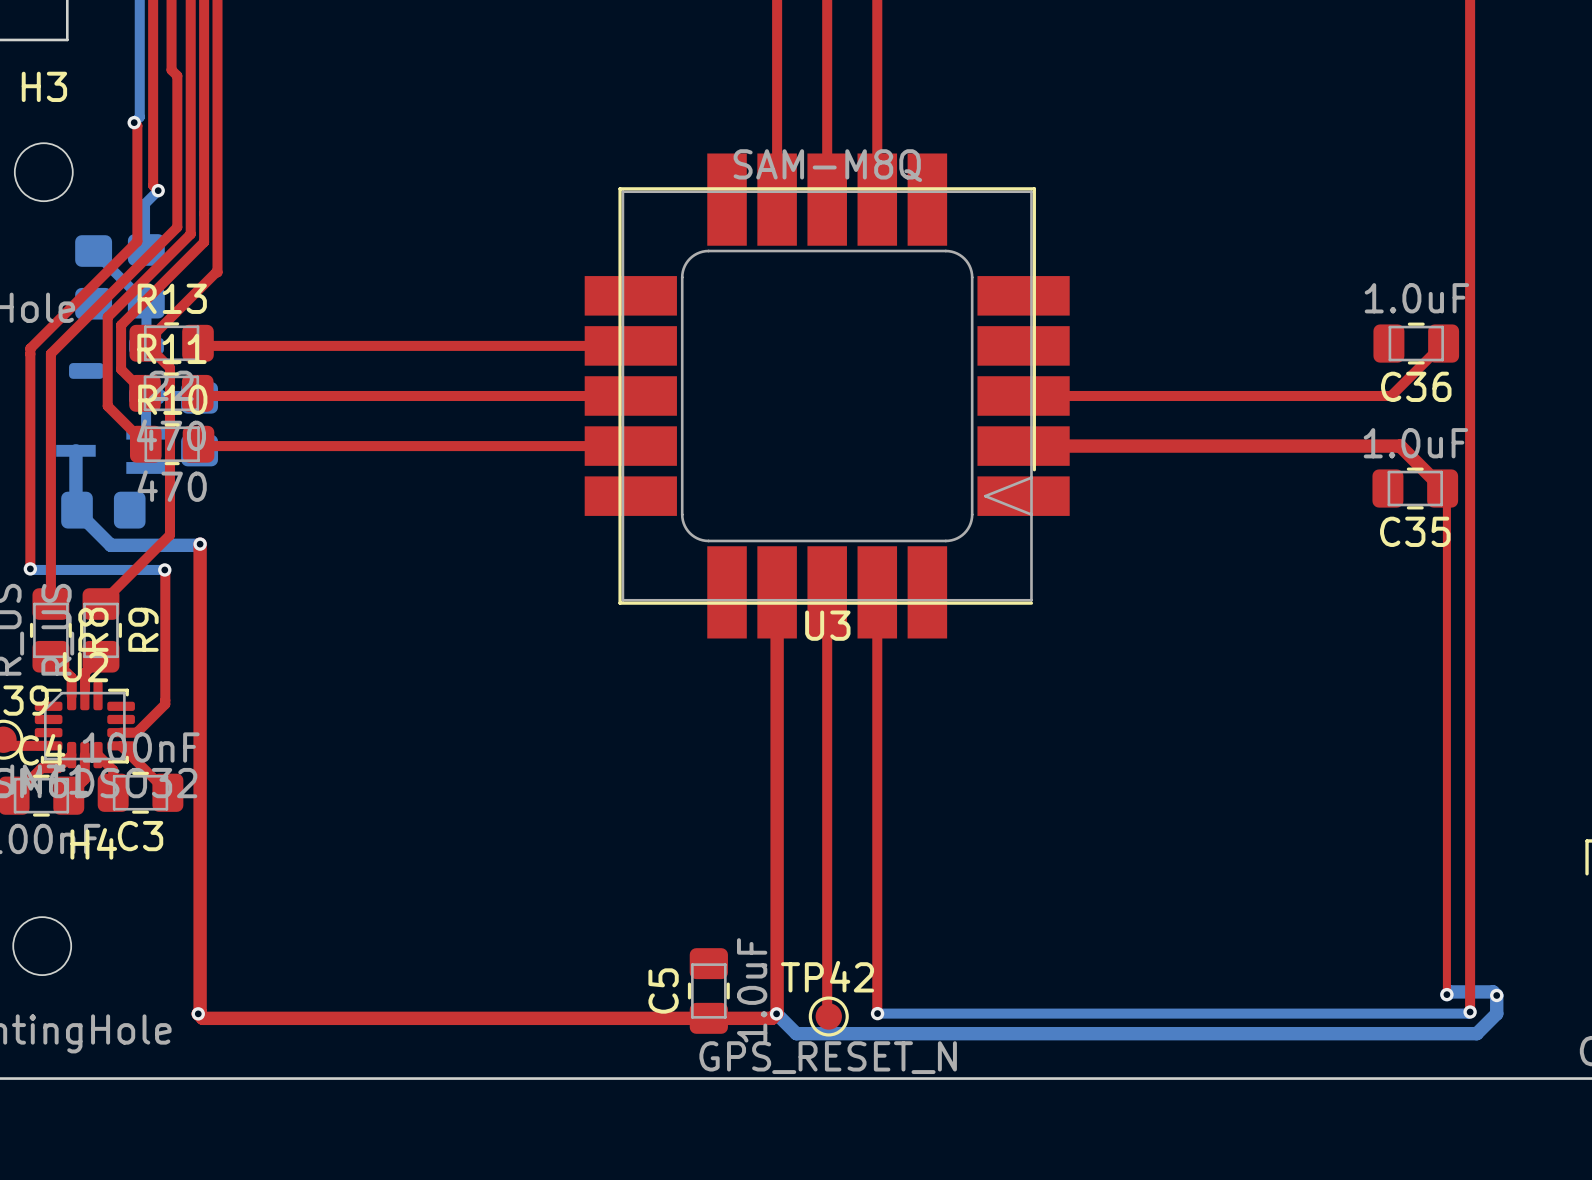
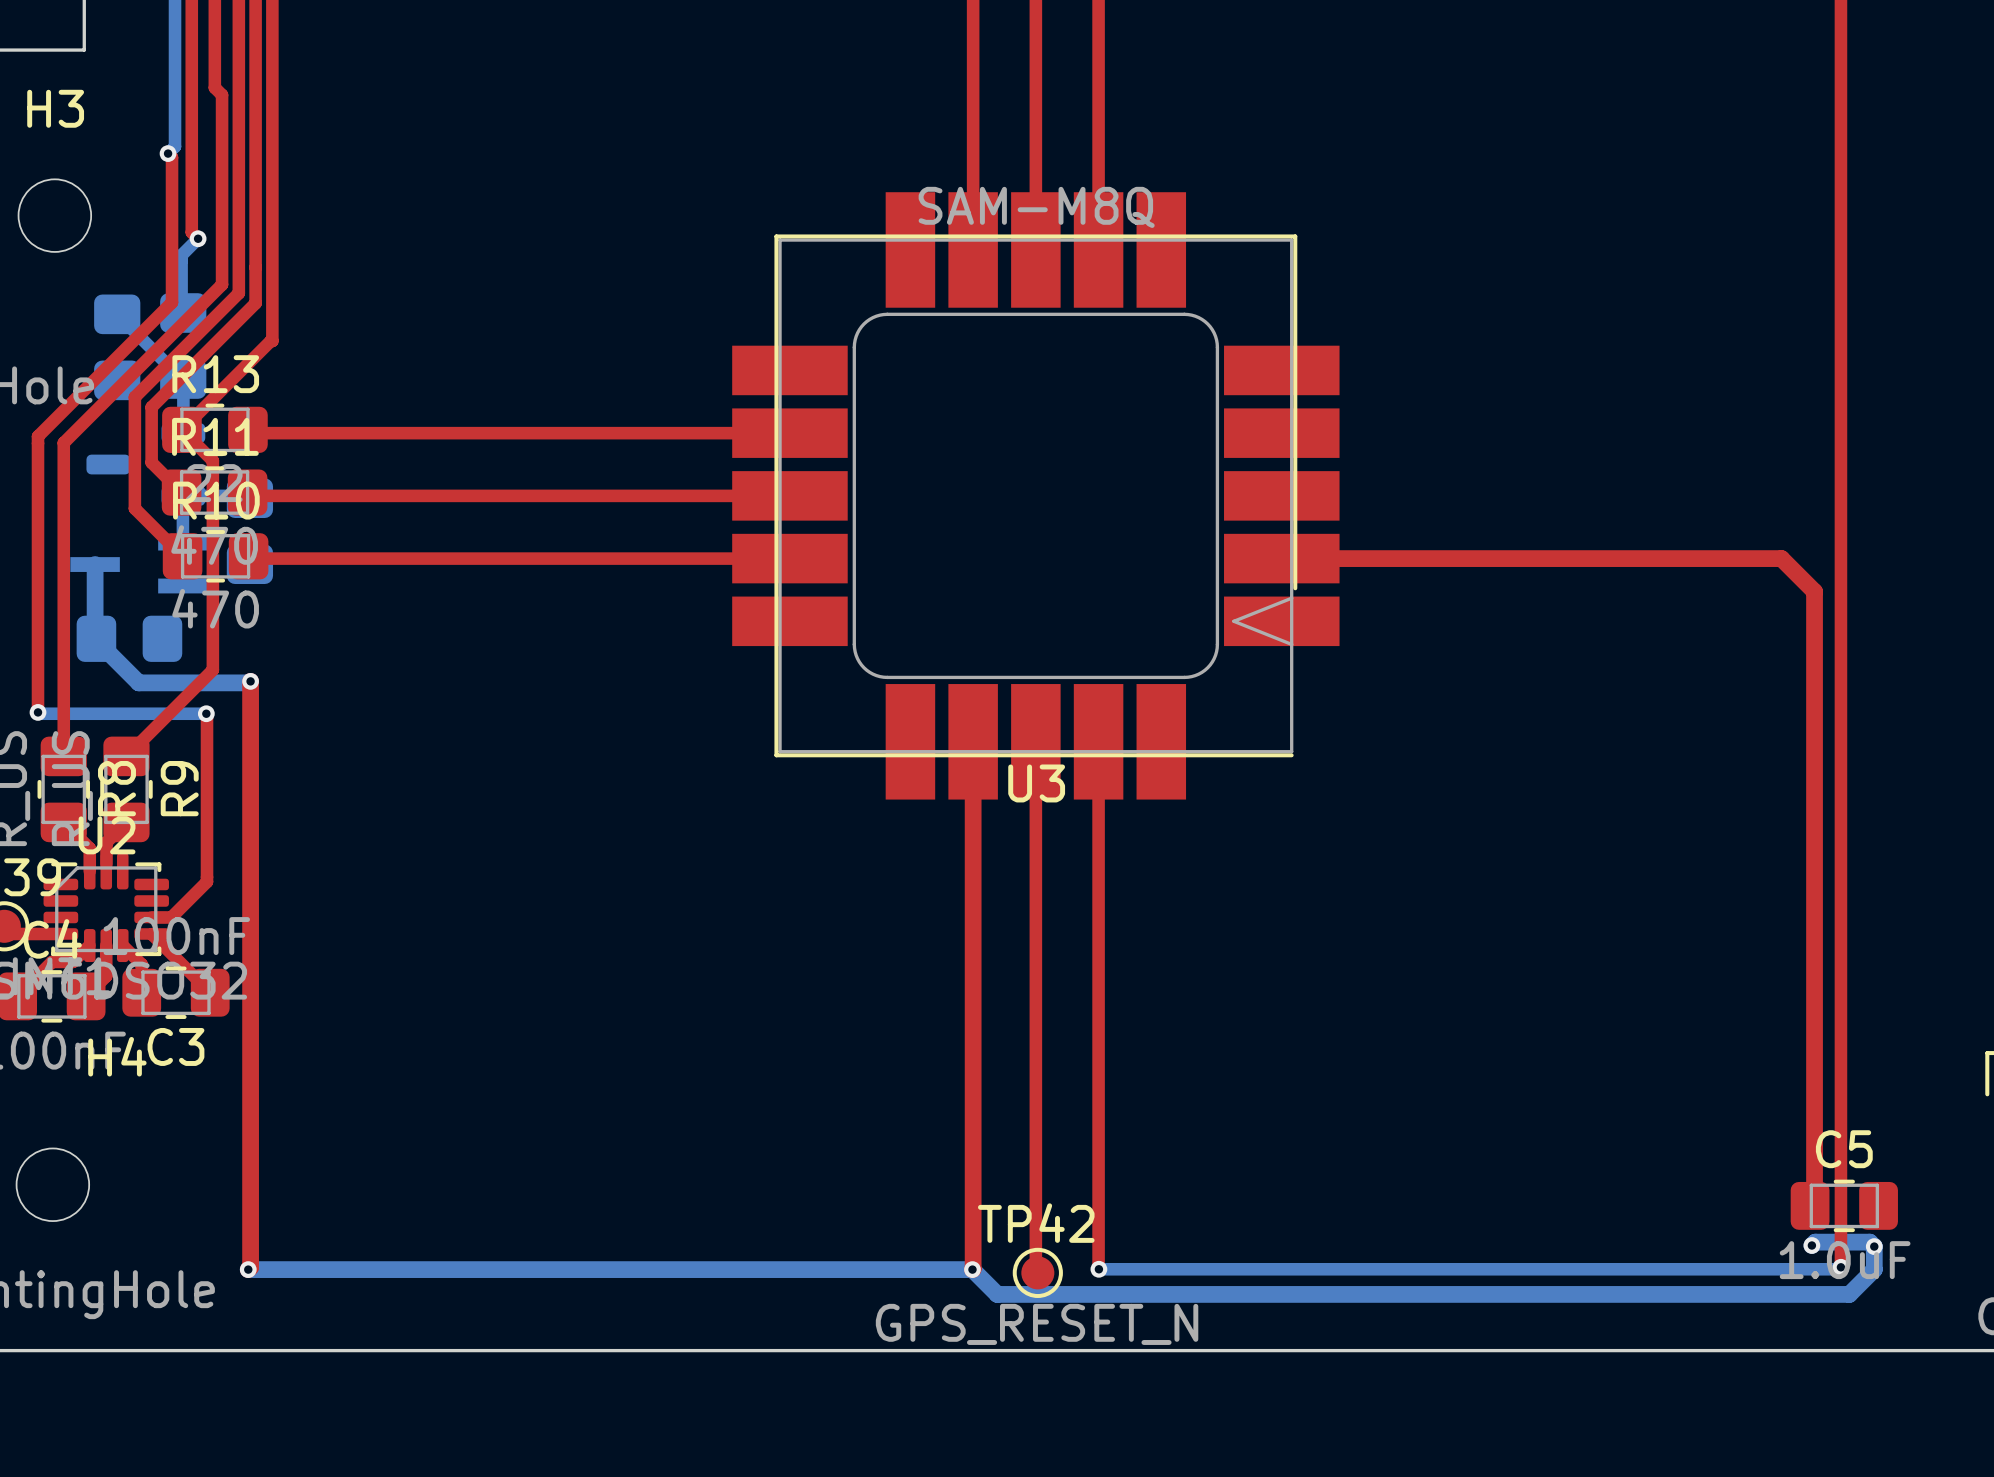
C36: 1.0uF (1416, 343) -> none
top track: (1443, 343) (1391, 395) (1023, 395) -> none
top track: (1400, 446) (1446, 492) (1446, 994) -> (1753, 558) (1781, 558) (1814, 591) (1814, 1201) (1810, 1205)
C35: 1.0uF (1415, 488) -> none
C5 rotation: 0° (708, 990) -> 90° clockwise (1844, 1205)
C5 position: (708, 990) -> (1844, 1205)
top track: (198, 1013) (202, 1018) (772, 1018) (776, 1013) -> none
bottom track: none -> (248, 1269) (972, 1269)

